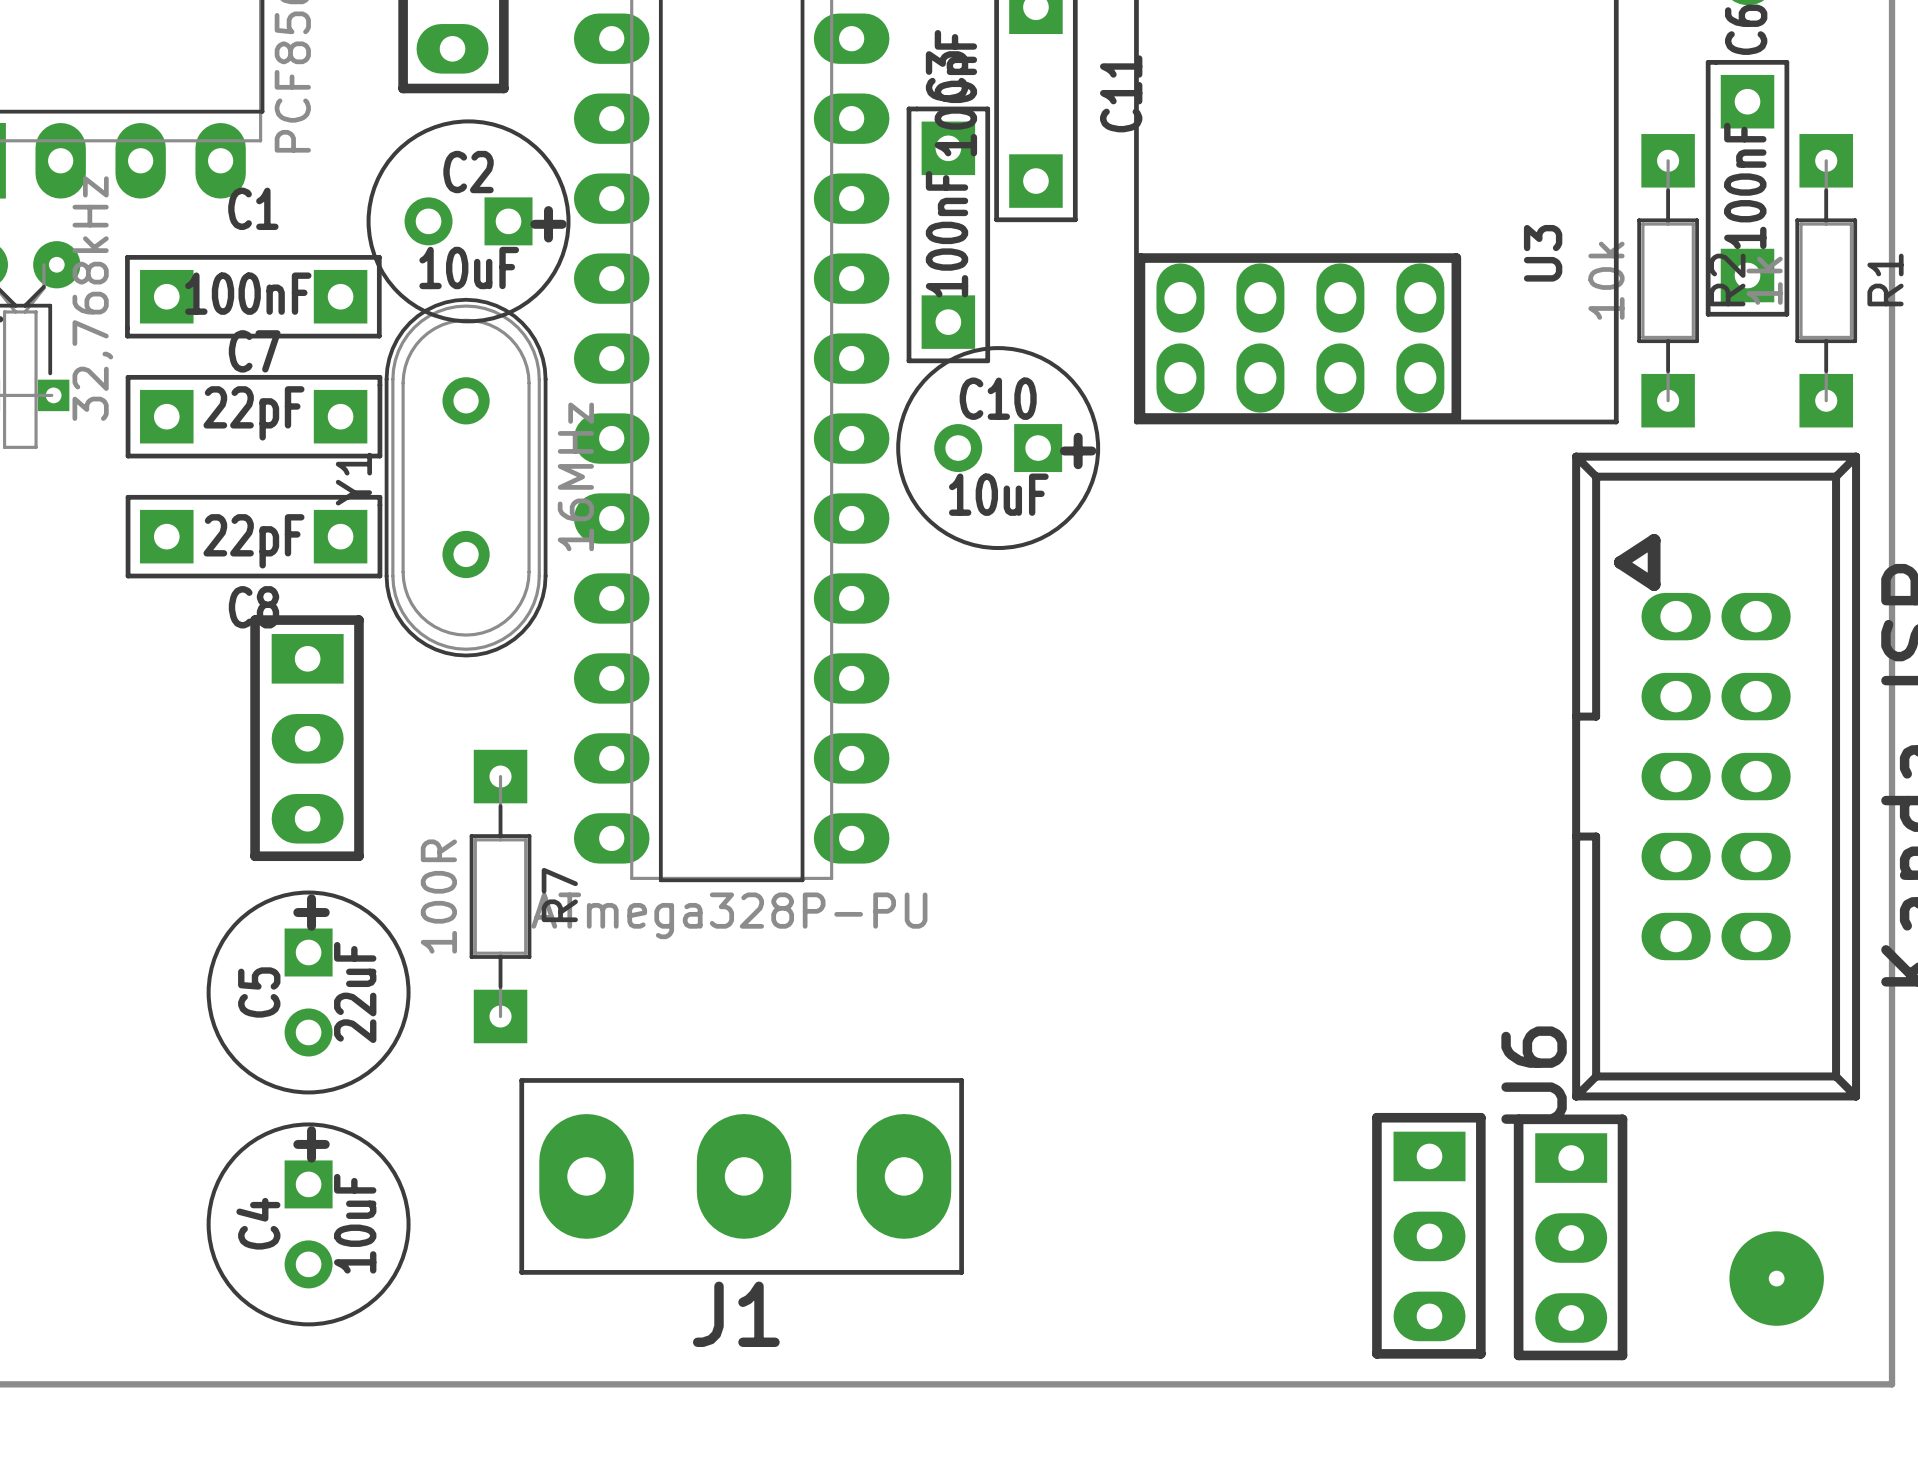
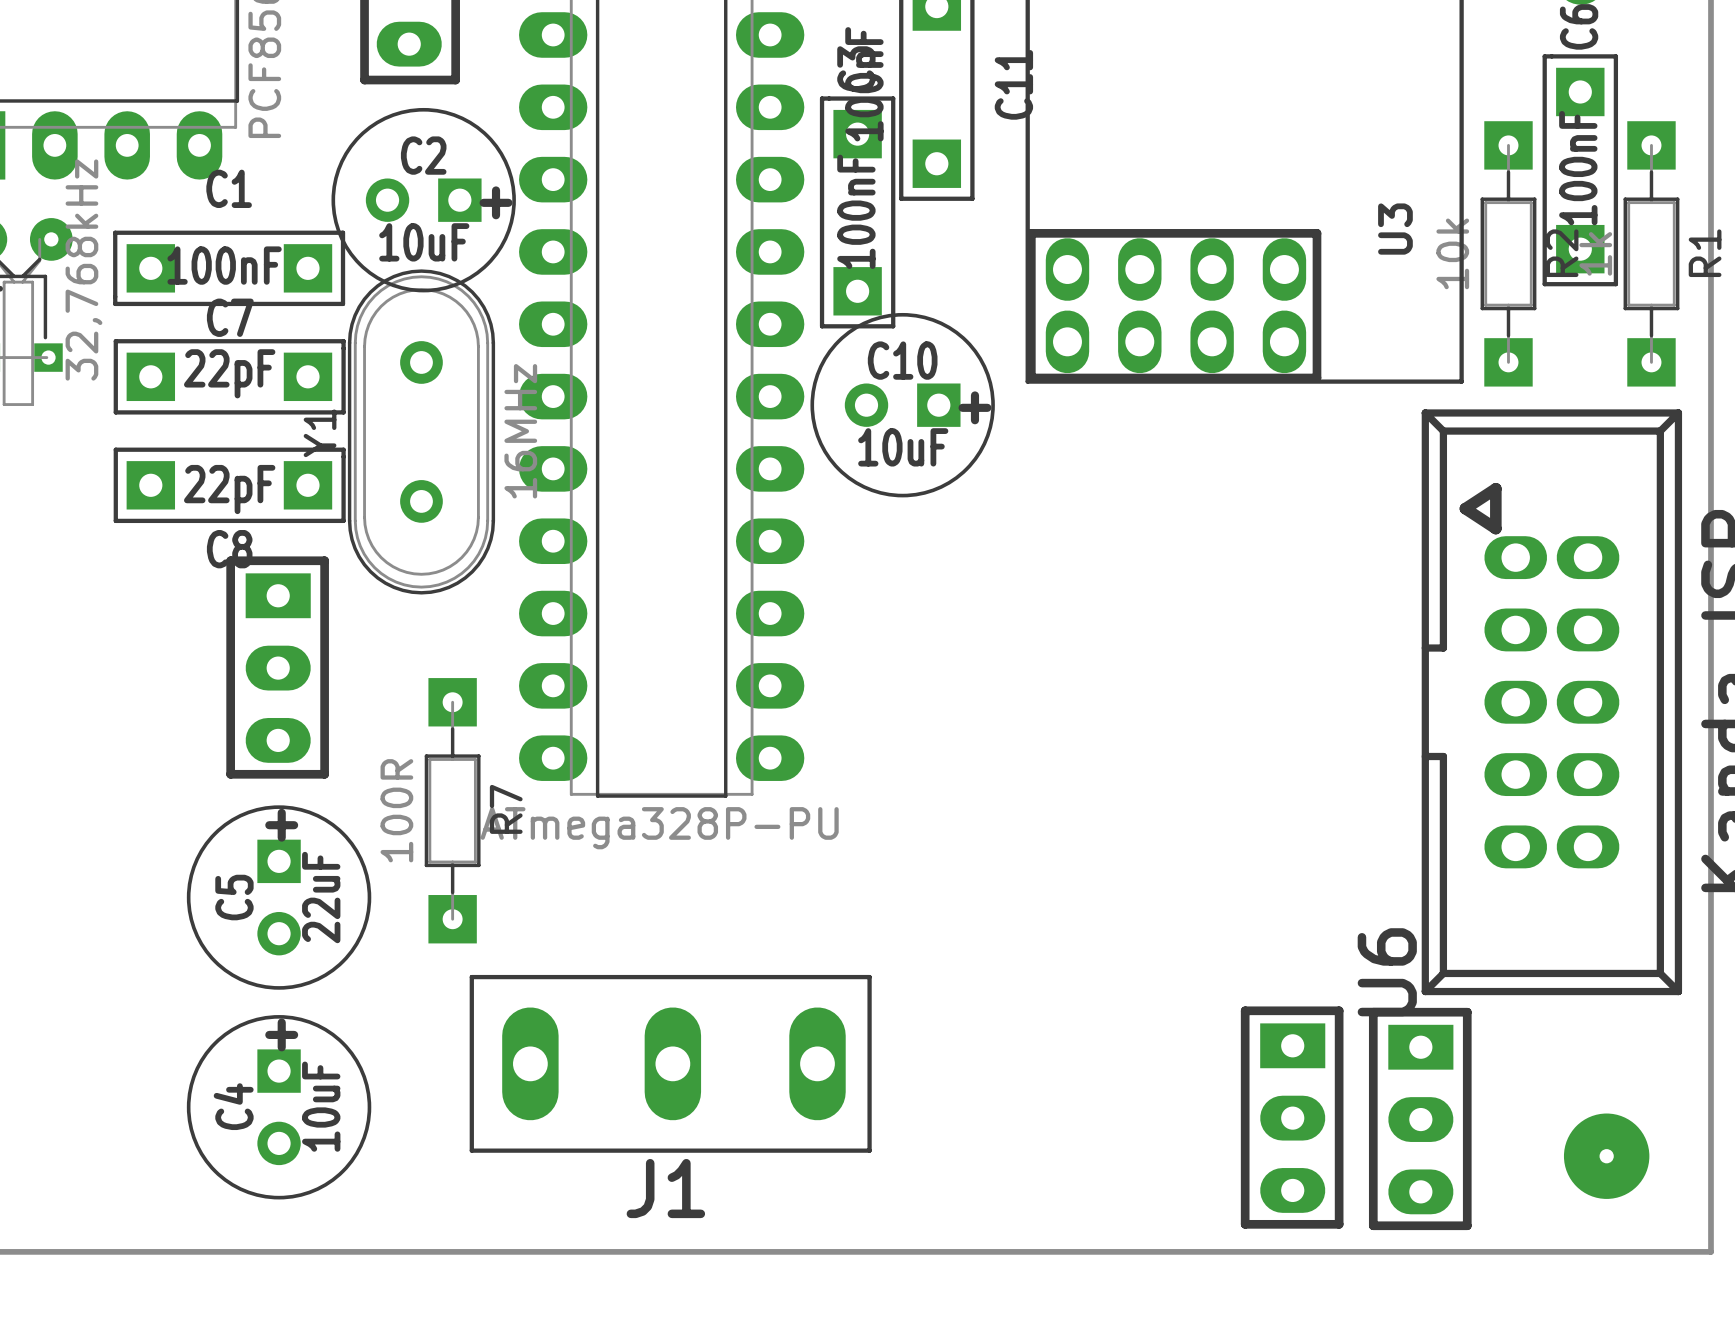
J1 footprint: [519, 1078, 964, 1275] -> [469, 974, 872, 1153]

